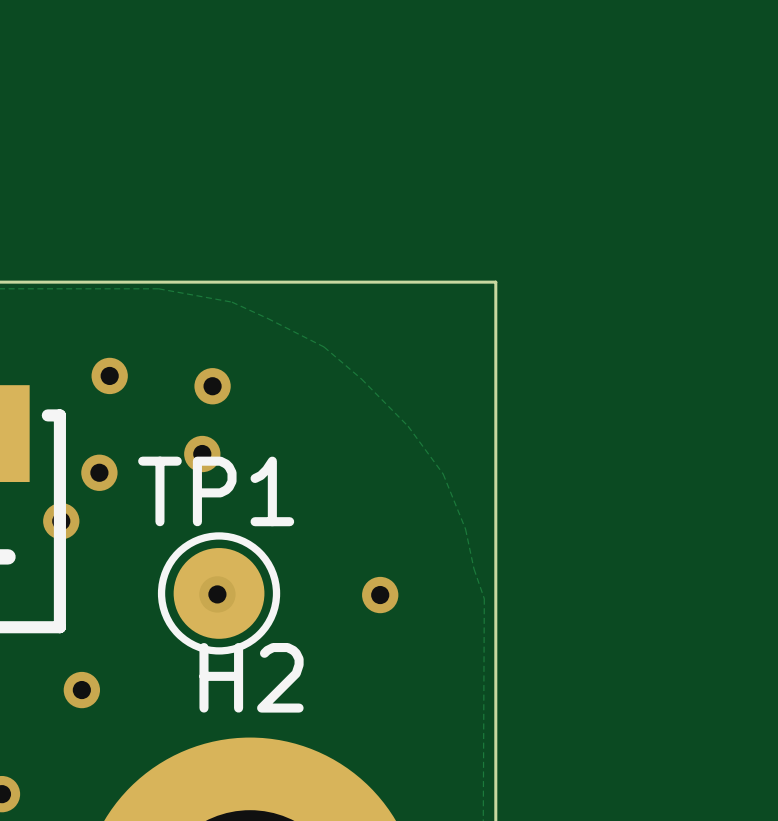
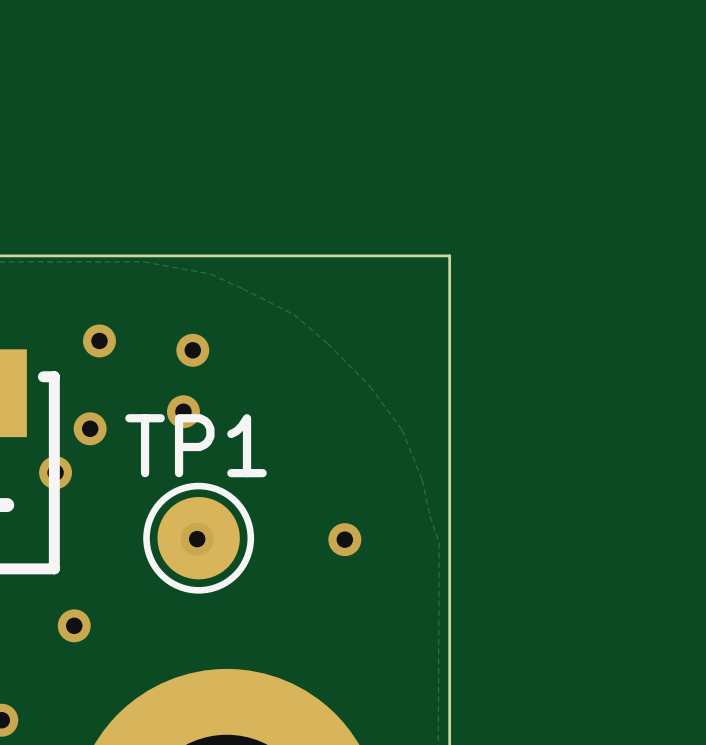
H2 name: H2 (251, 677) -> none

